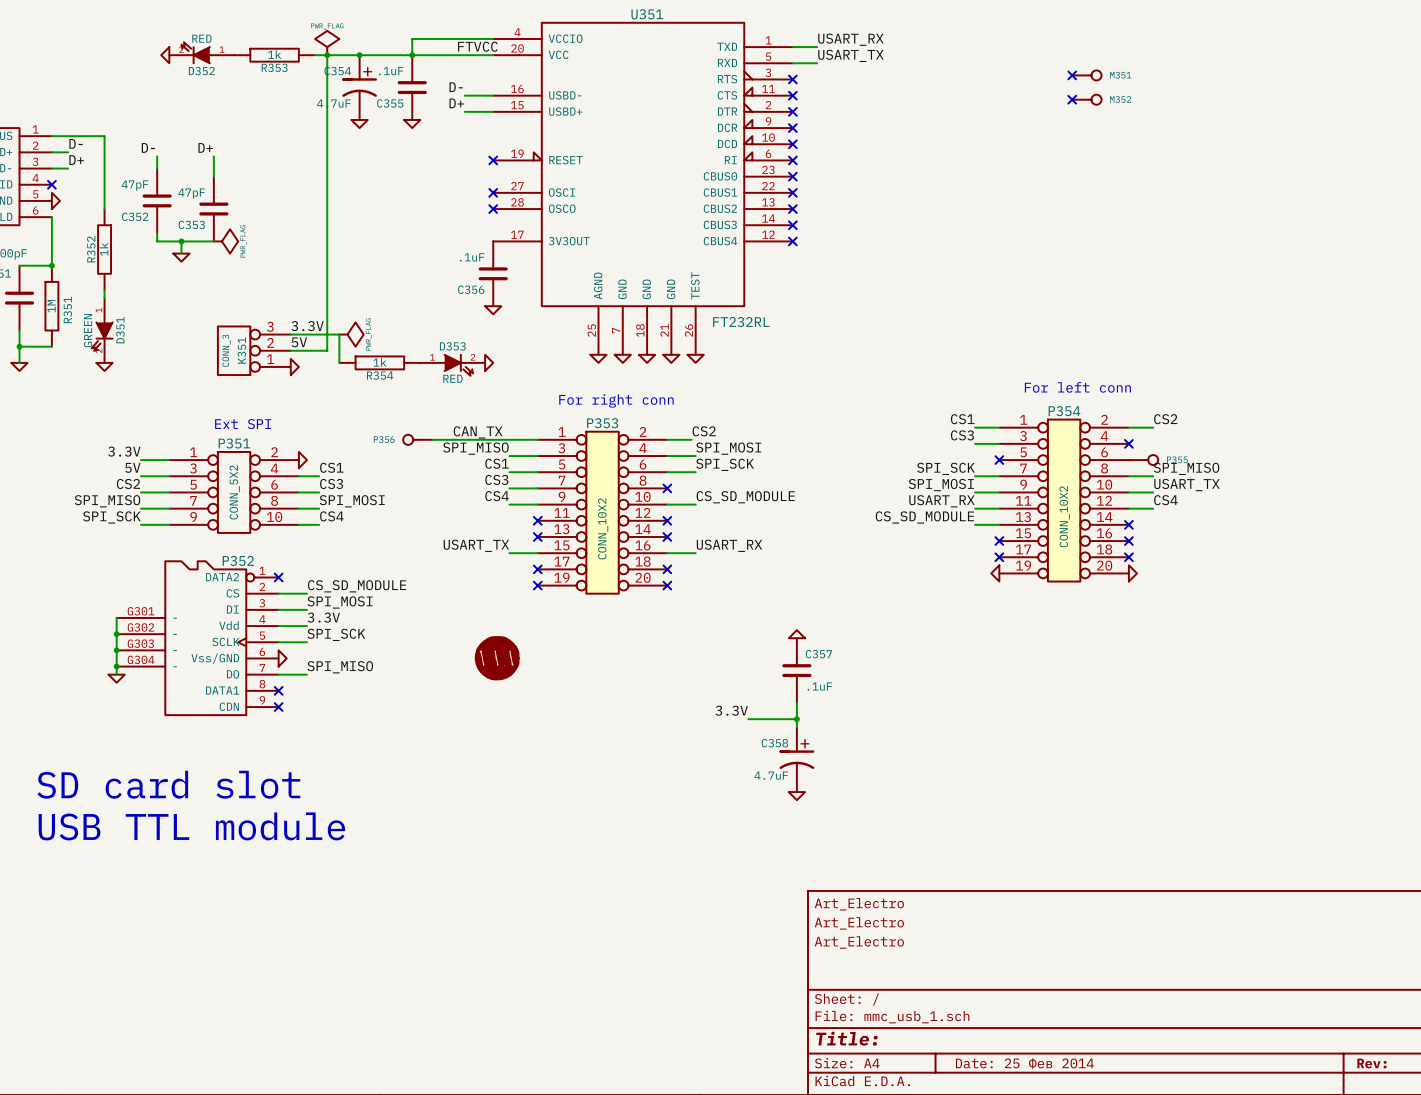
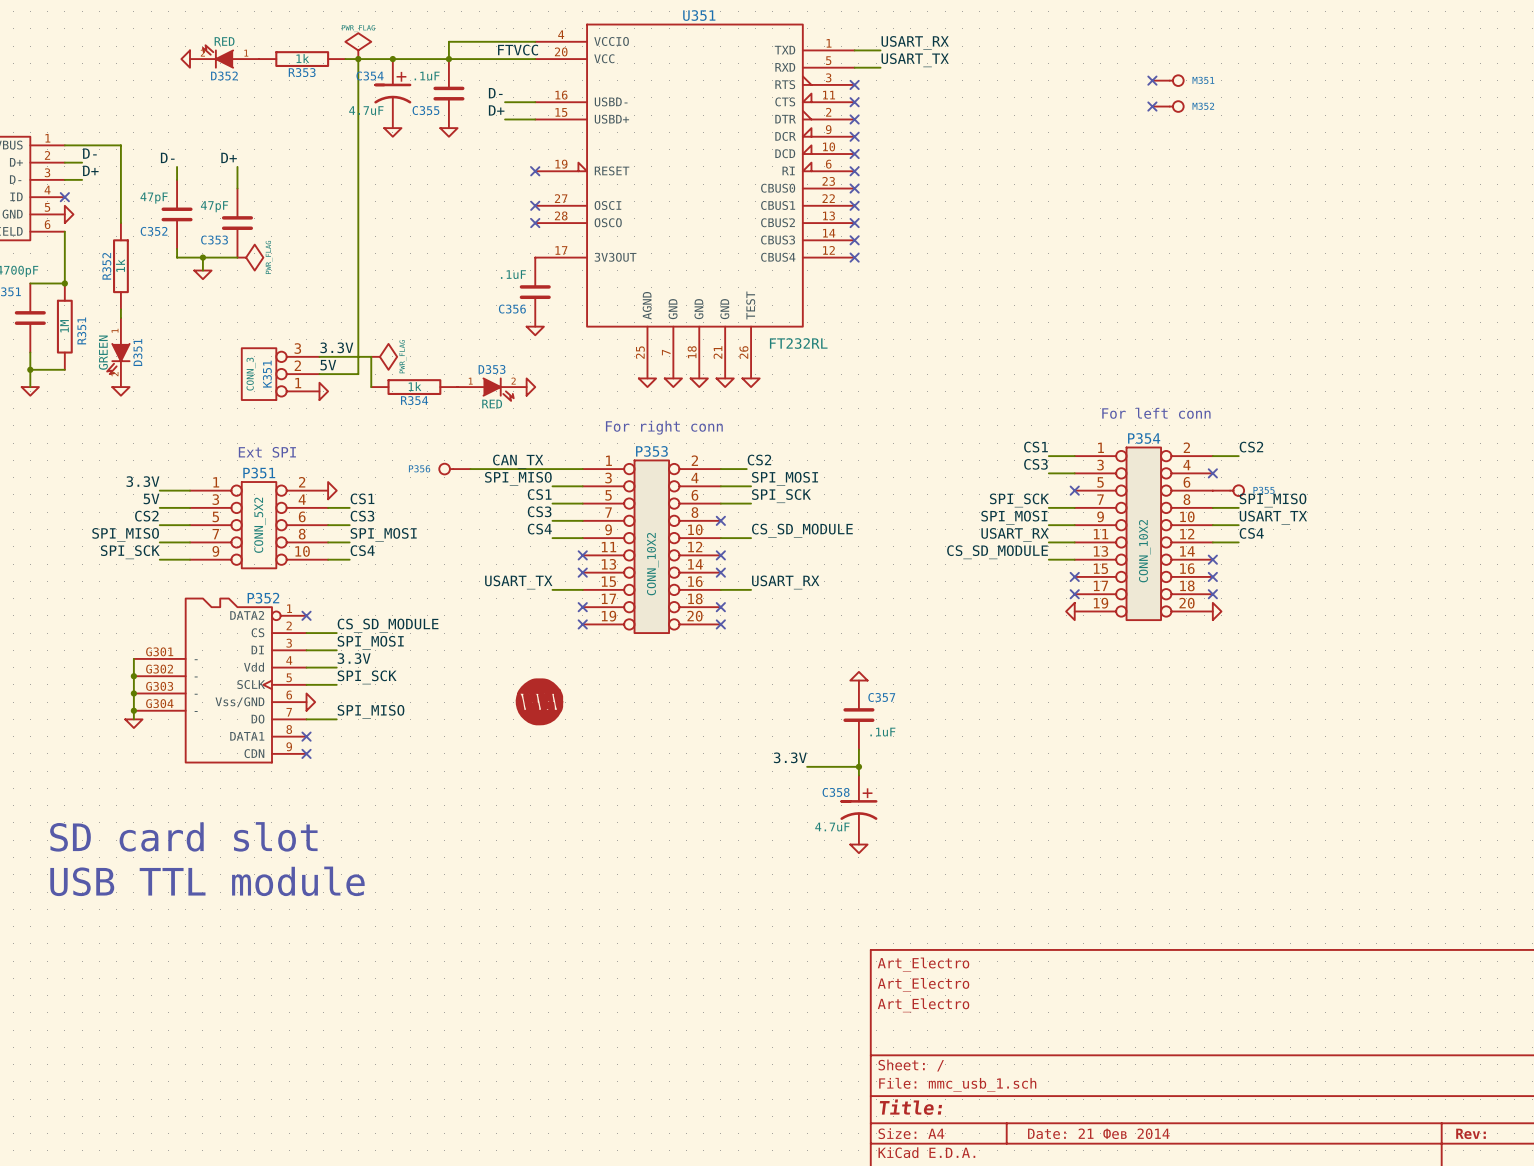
title block: Date: 25 Фев 2014 (1024, 1063) -> Date: 21 Фев 2014 (1098, 1133)

